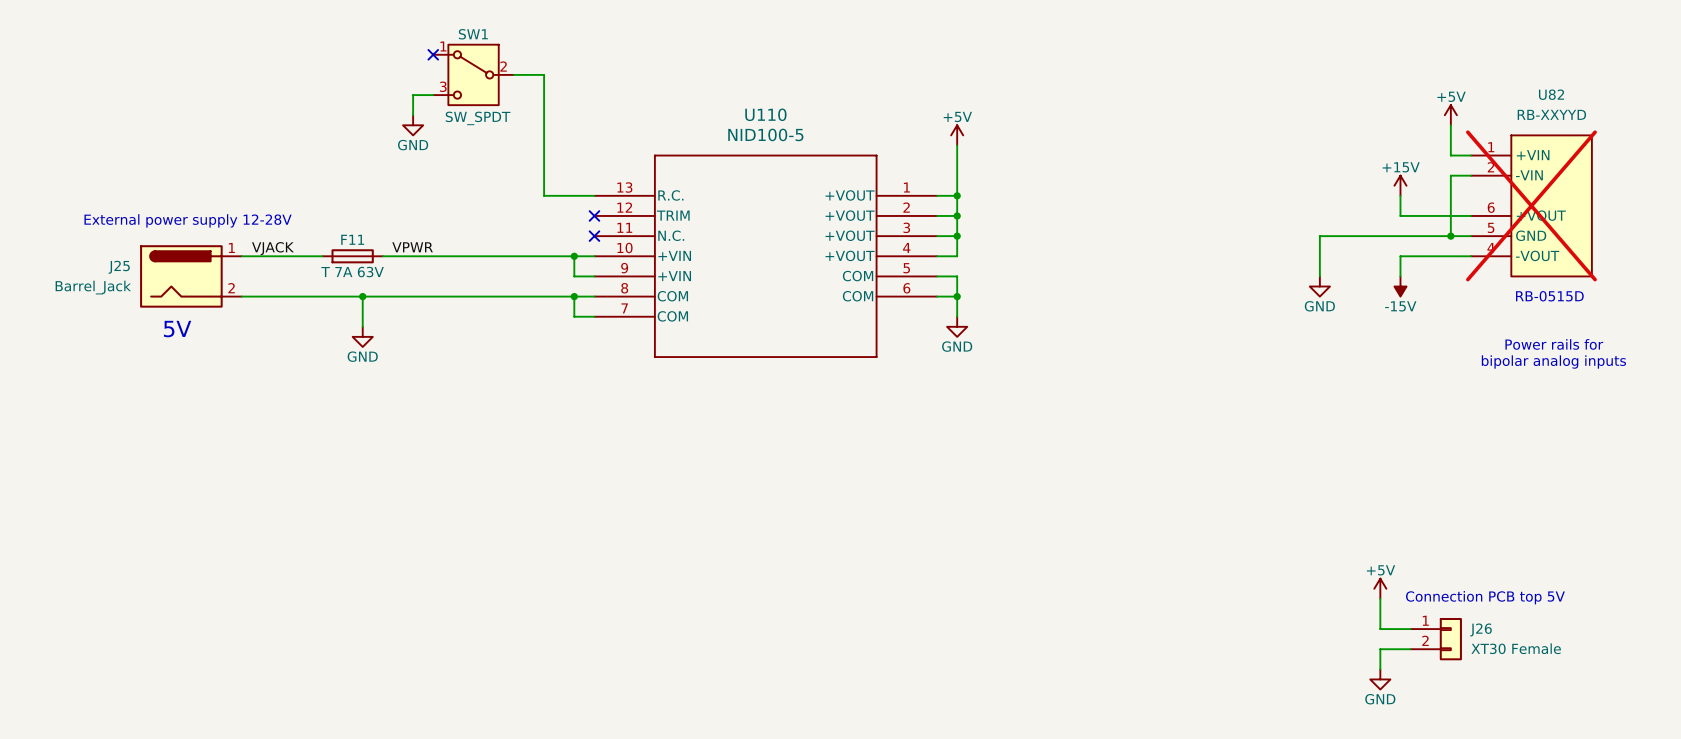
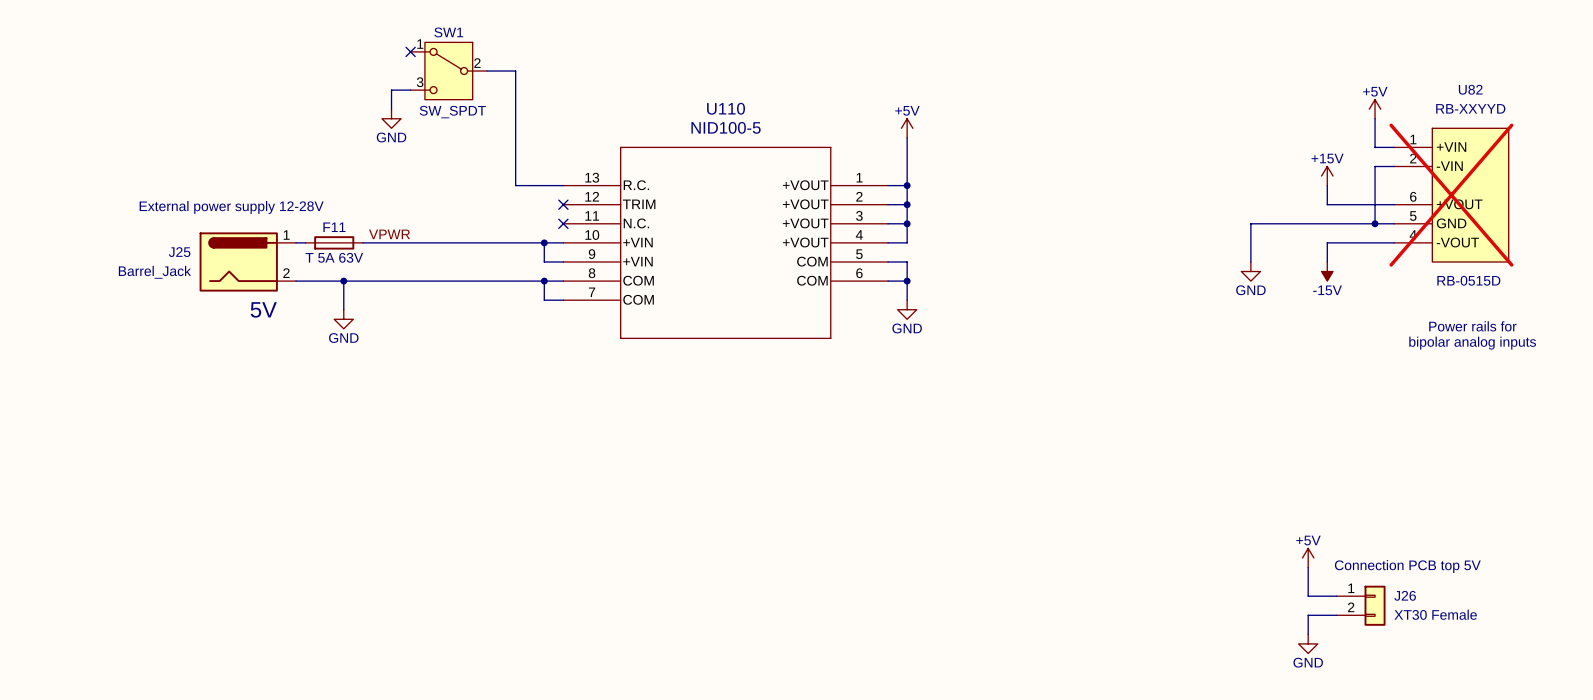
text position: External power supply 12-28V (188, 220) -> External power supply 12-28V (231, 207)
label: VJACK (272, 248) -> none
F11 value: T 7A 63V (352, 272) -> T 5A 63V (334, 257)
J25 position: (190, 276) -> (247, 261)
text position: 5V (177, 329) -> 5V (263, 309)

